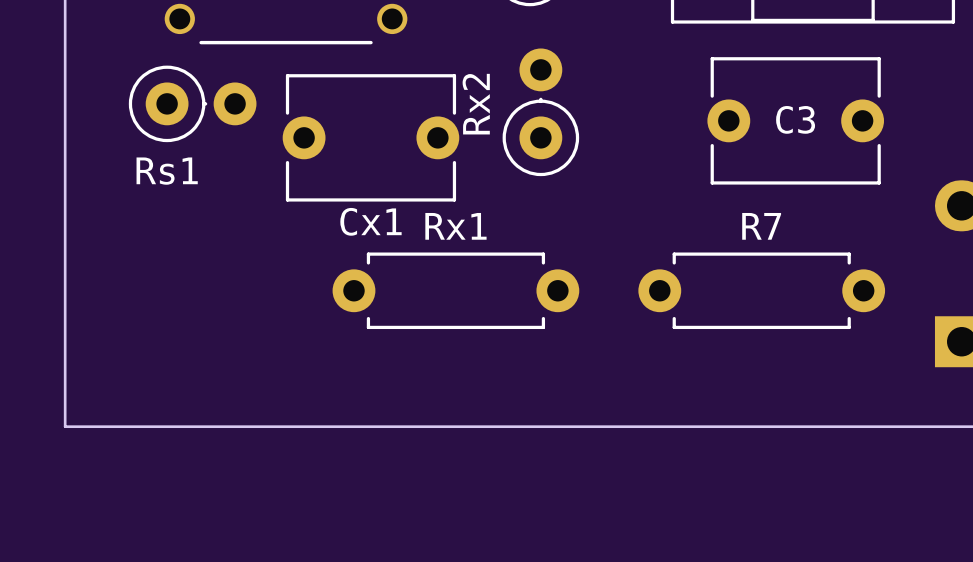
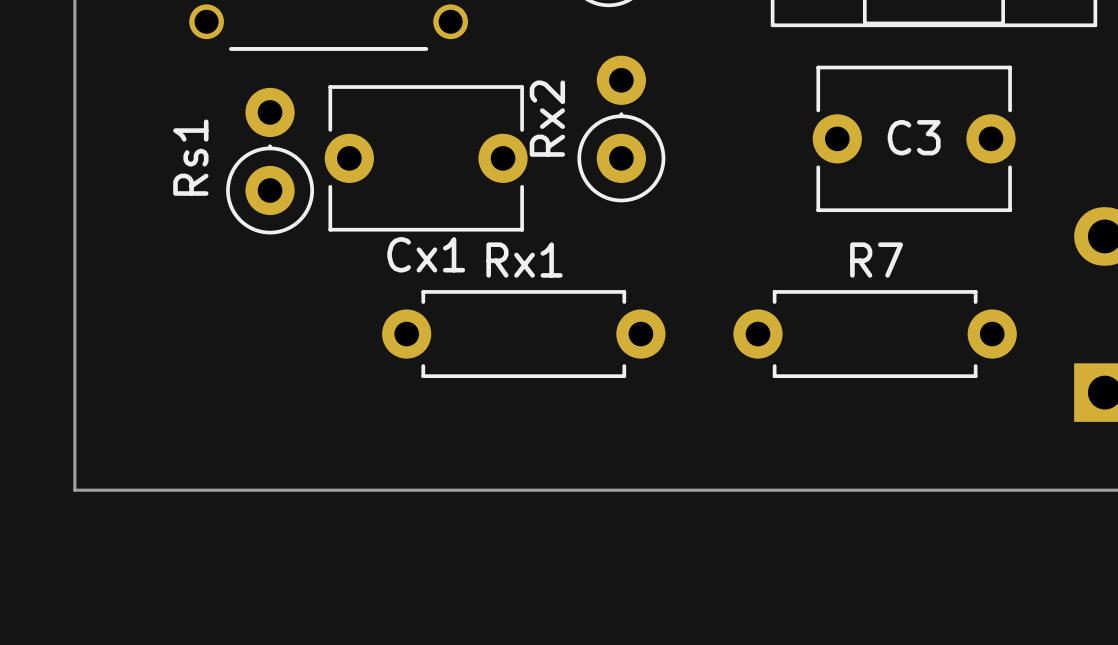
Rs1 rotation: 0° (192, 103) -> 90° counterclockwise (270, 161)
Rs1 name position: Rs1 (167, 171) -> Rs1 (190, 157)

